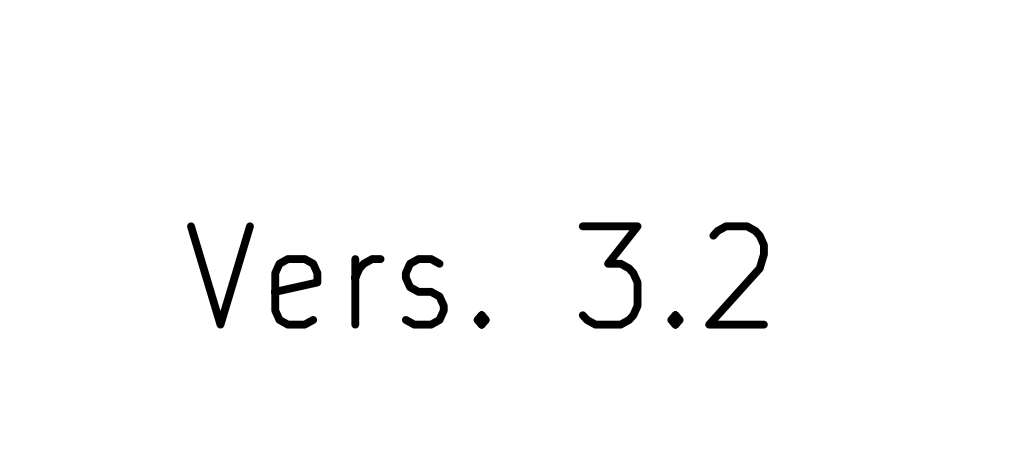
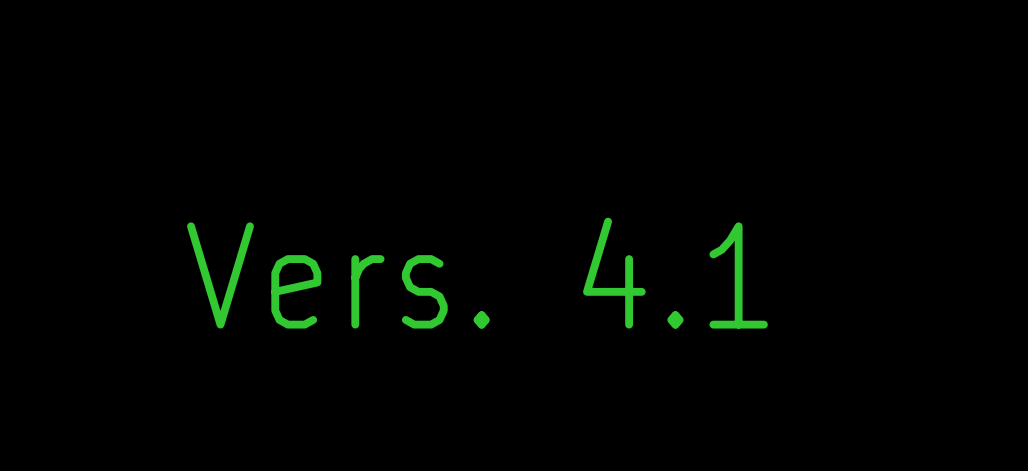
text: Vers. 3.2 (477, 275) -> Vers. 4.1 (477, 273)

